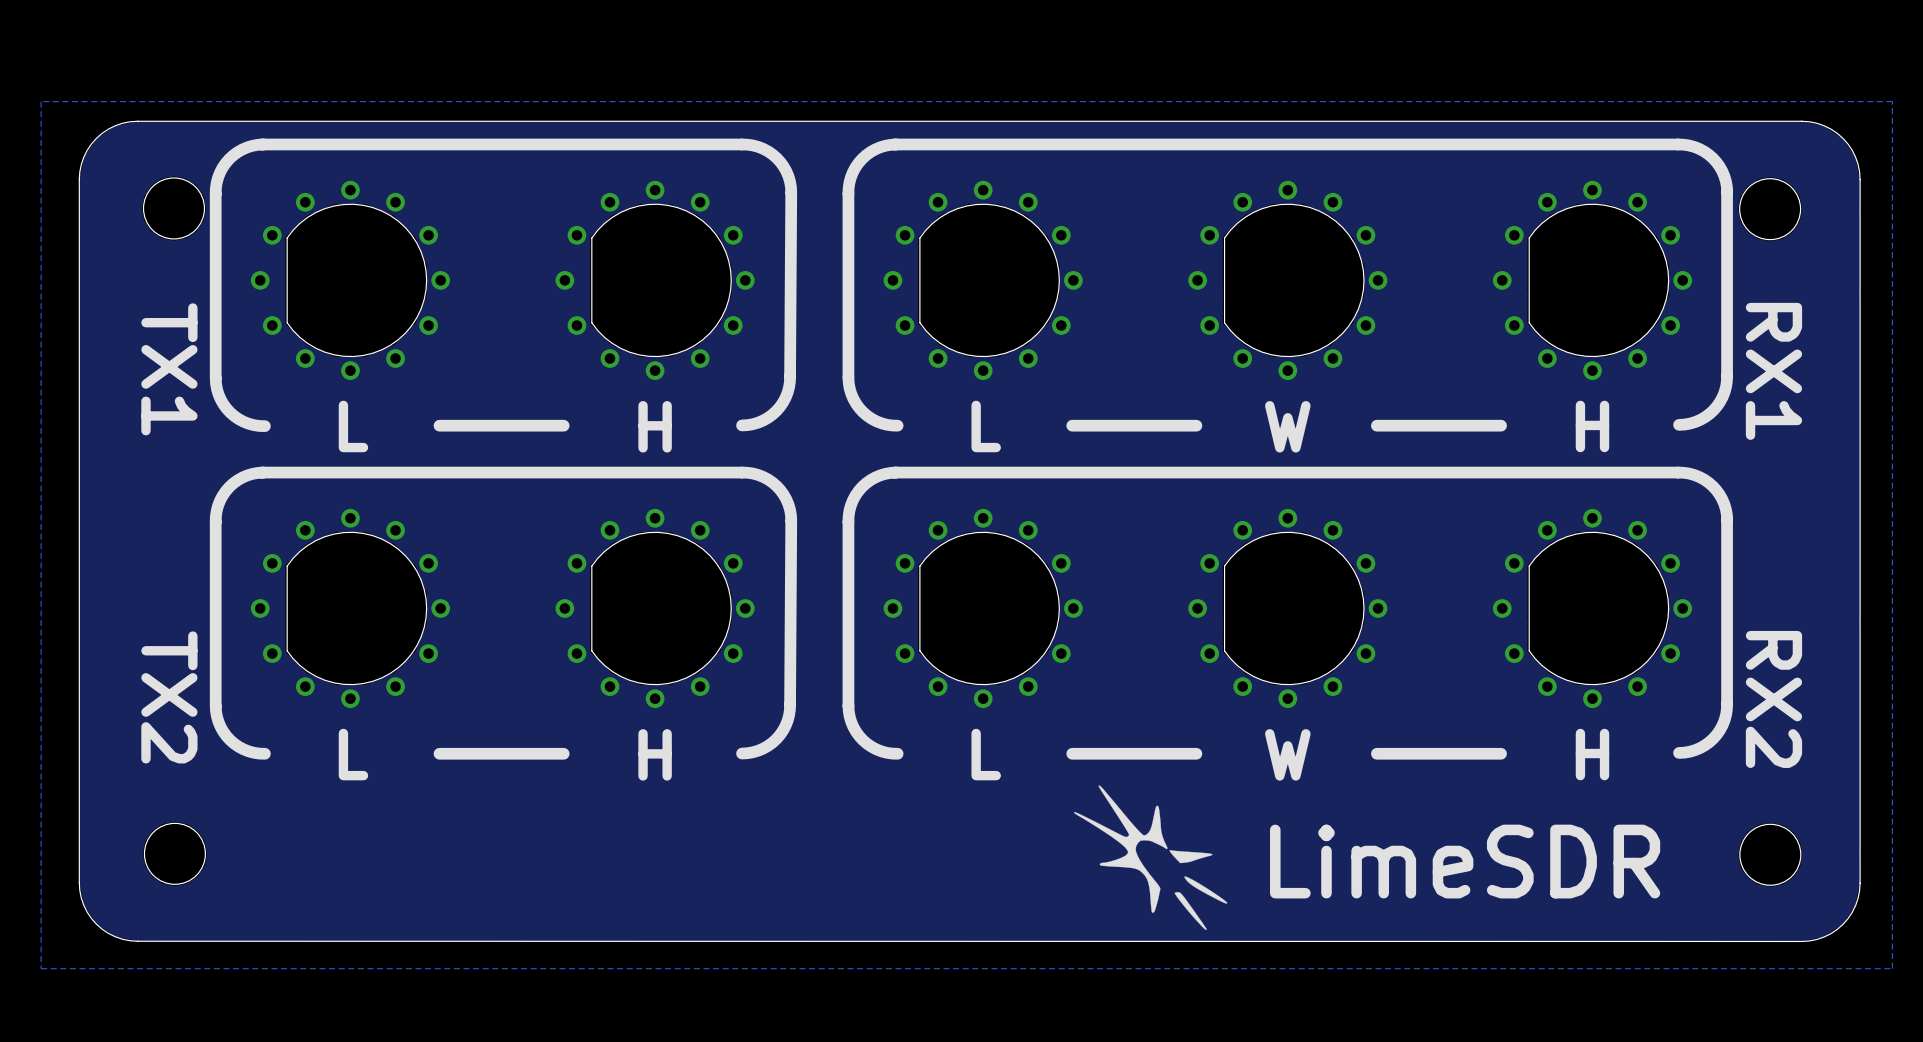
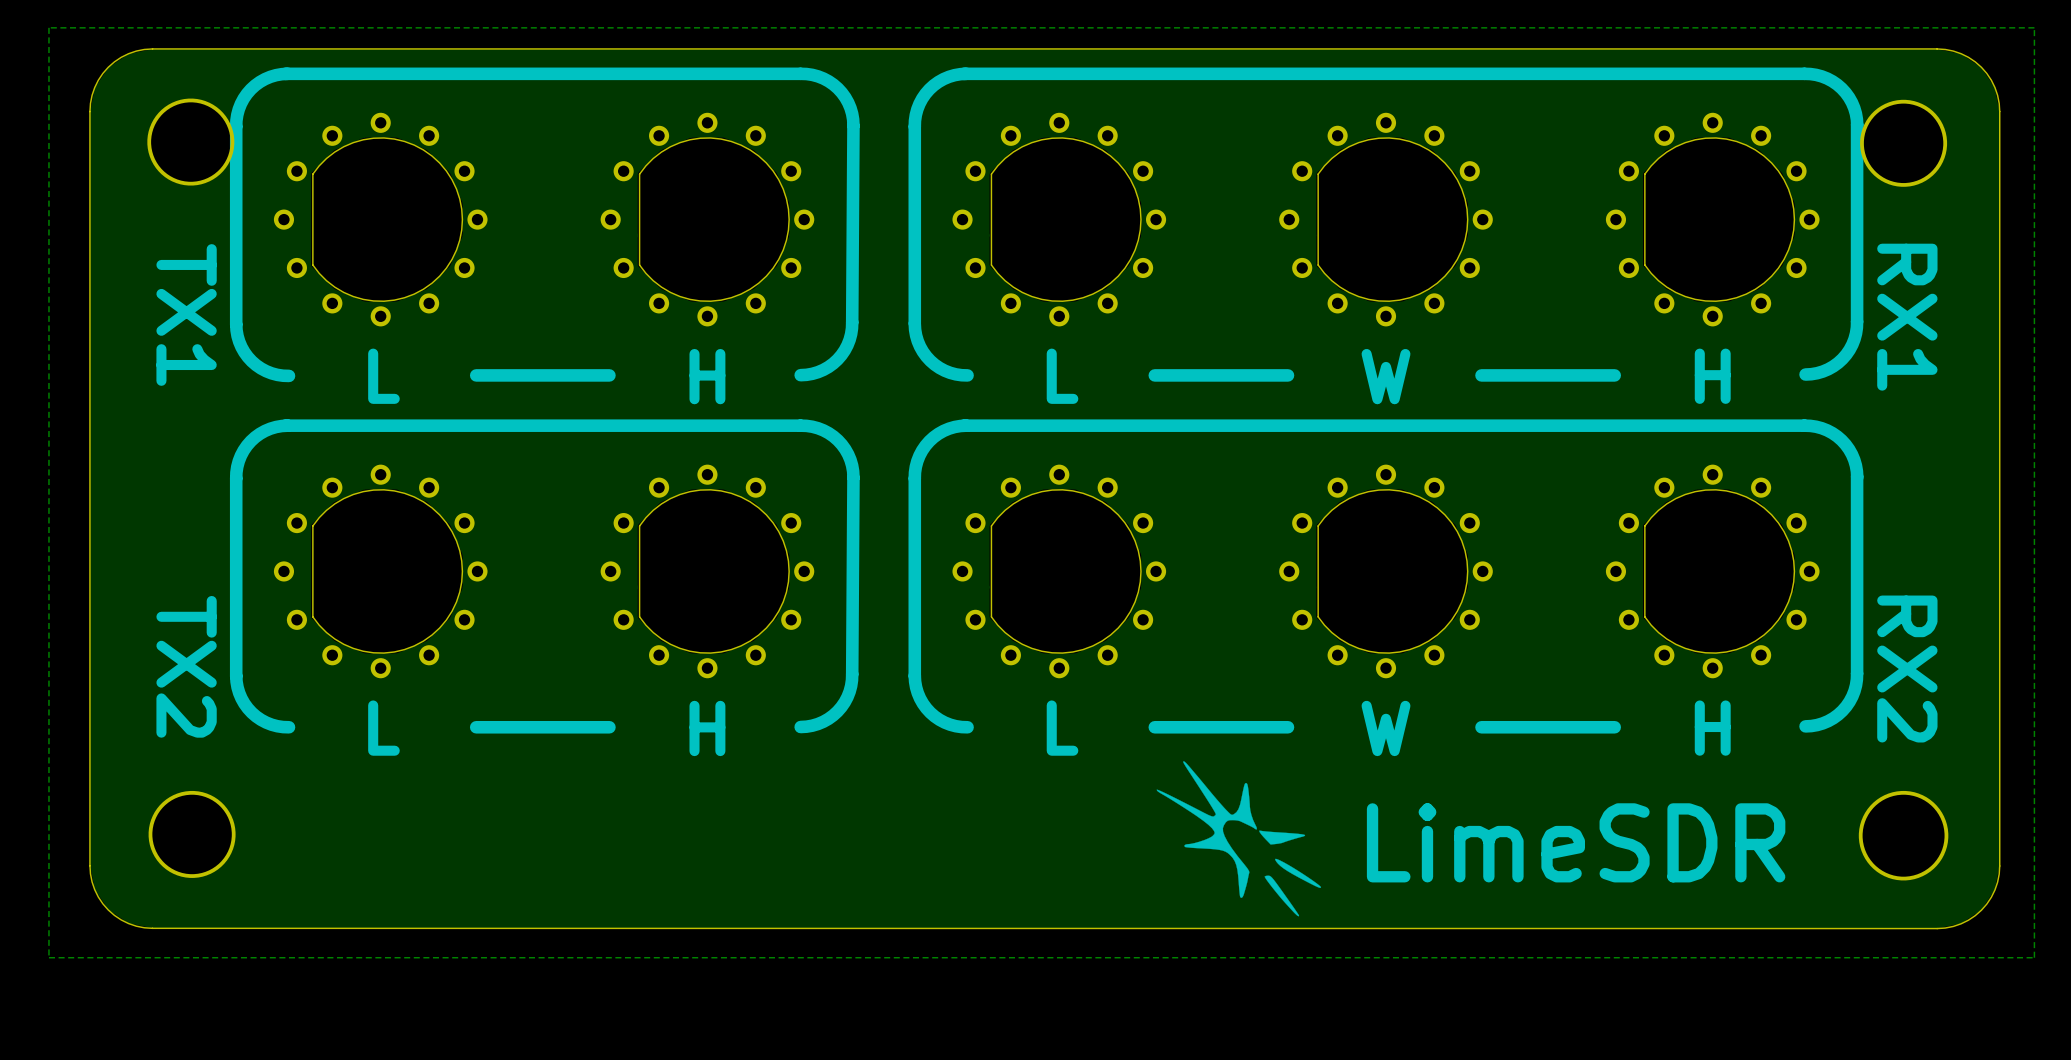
round board edge size: [143, 177, 205, 240] -> [147, 98, 235, 186]
round board edge size: [1739, 178, 1801, 240] -> [1860, 99, 1948, 187]
round board edge size: [144, 823, 206, 885] -> [148, 790, 236, 878]
round board edge size: [1739, 824, 1802, 886] -> [1858, 790, 1949, 881]

